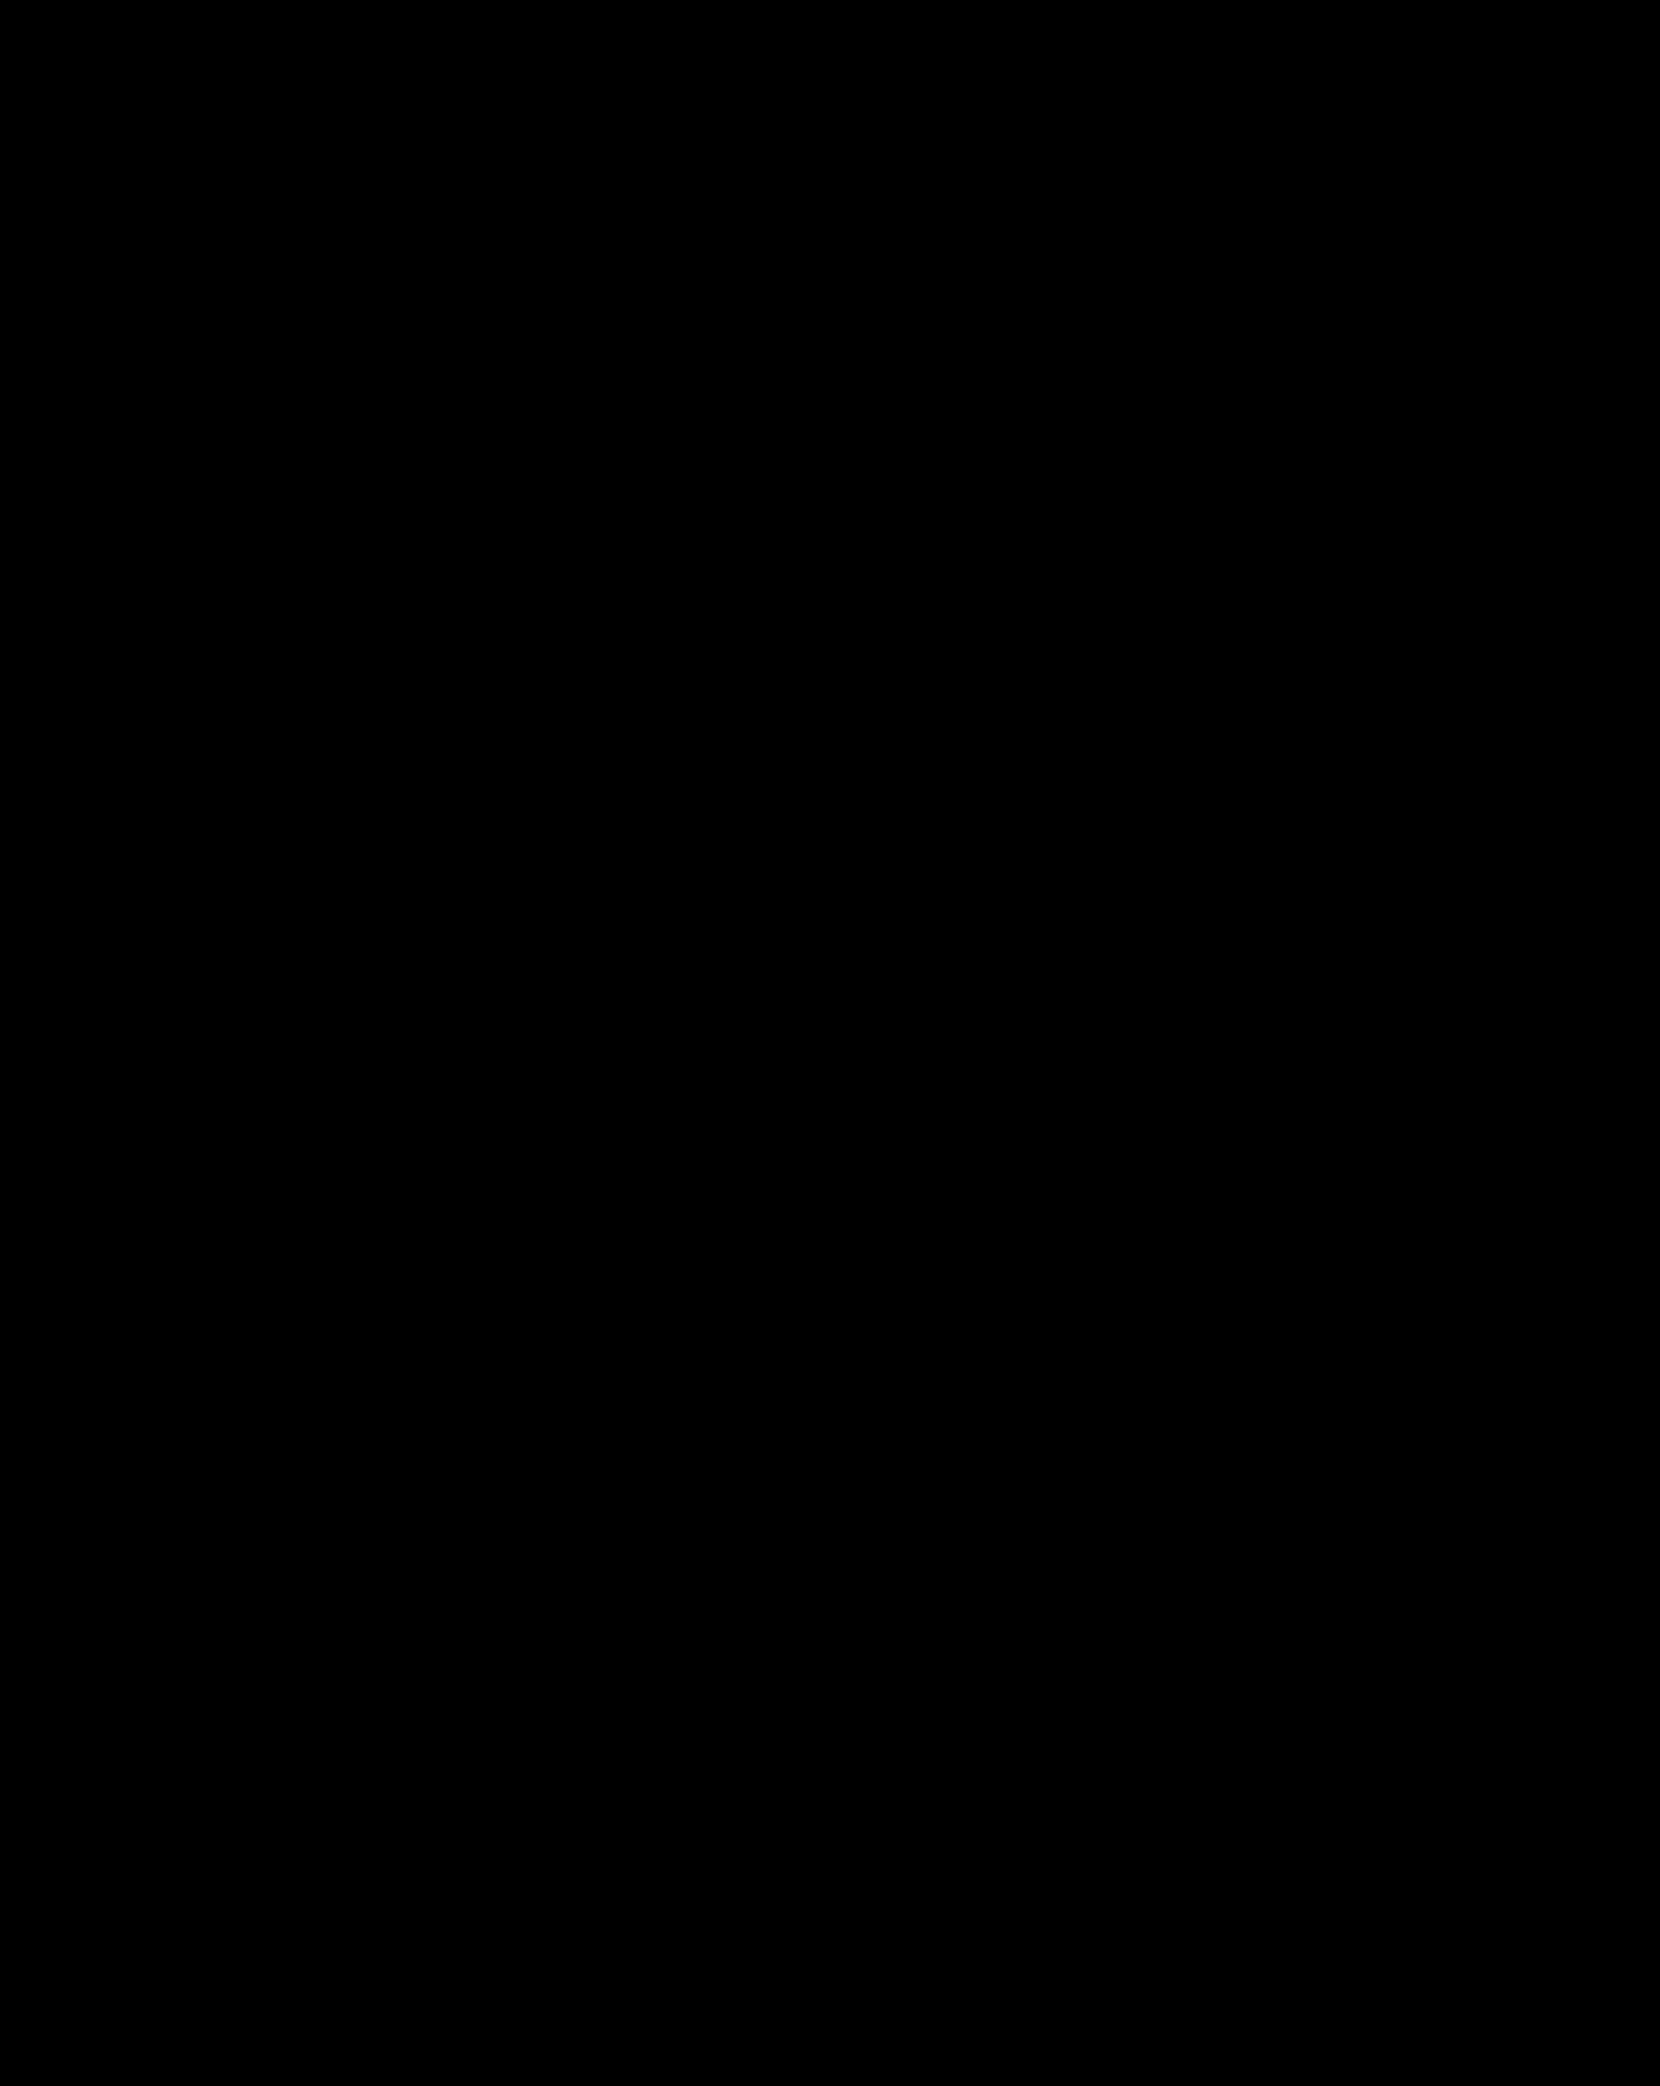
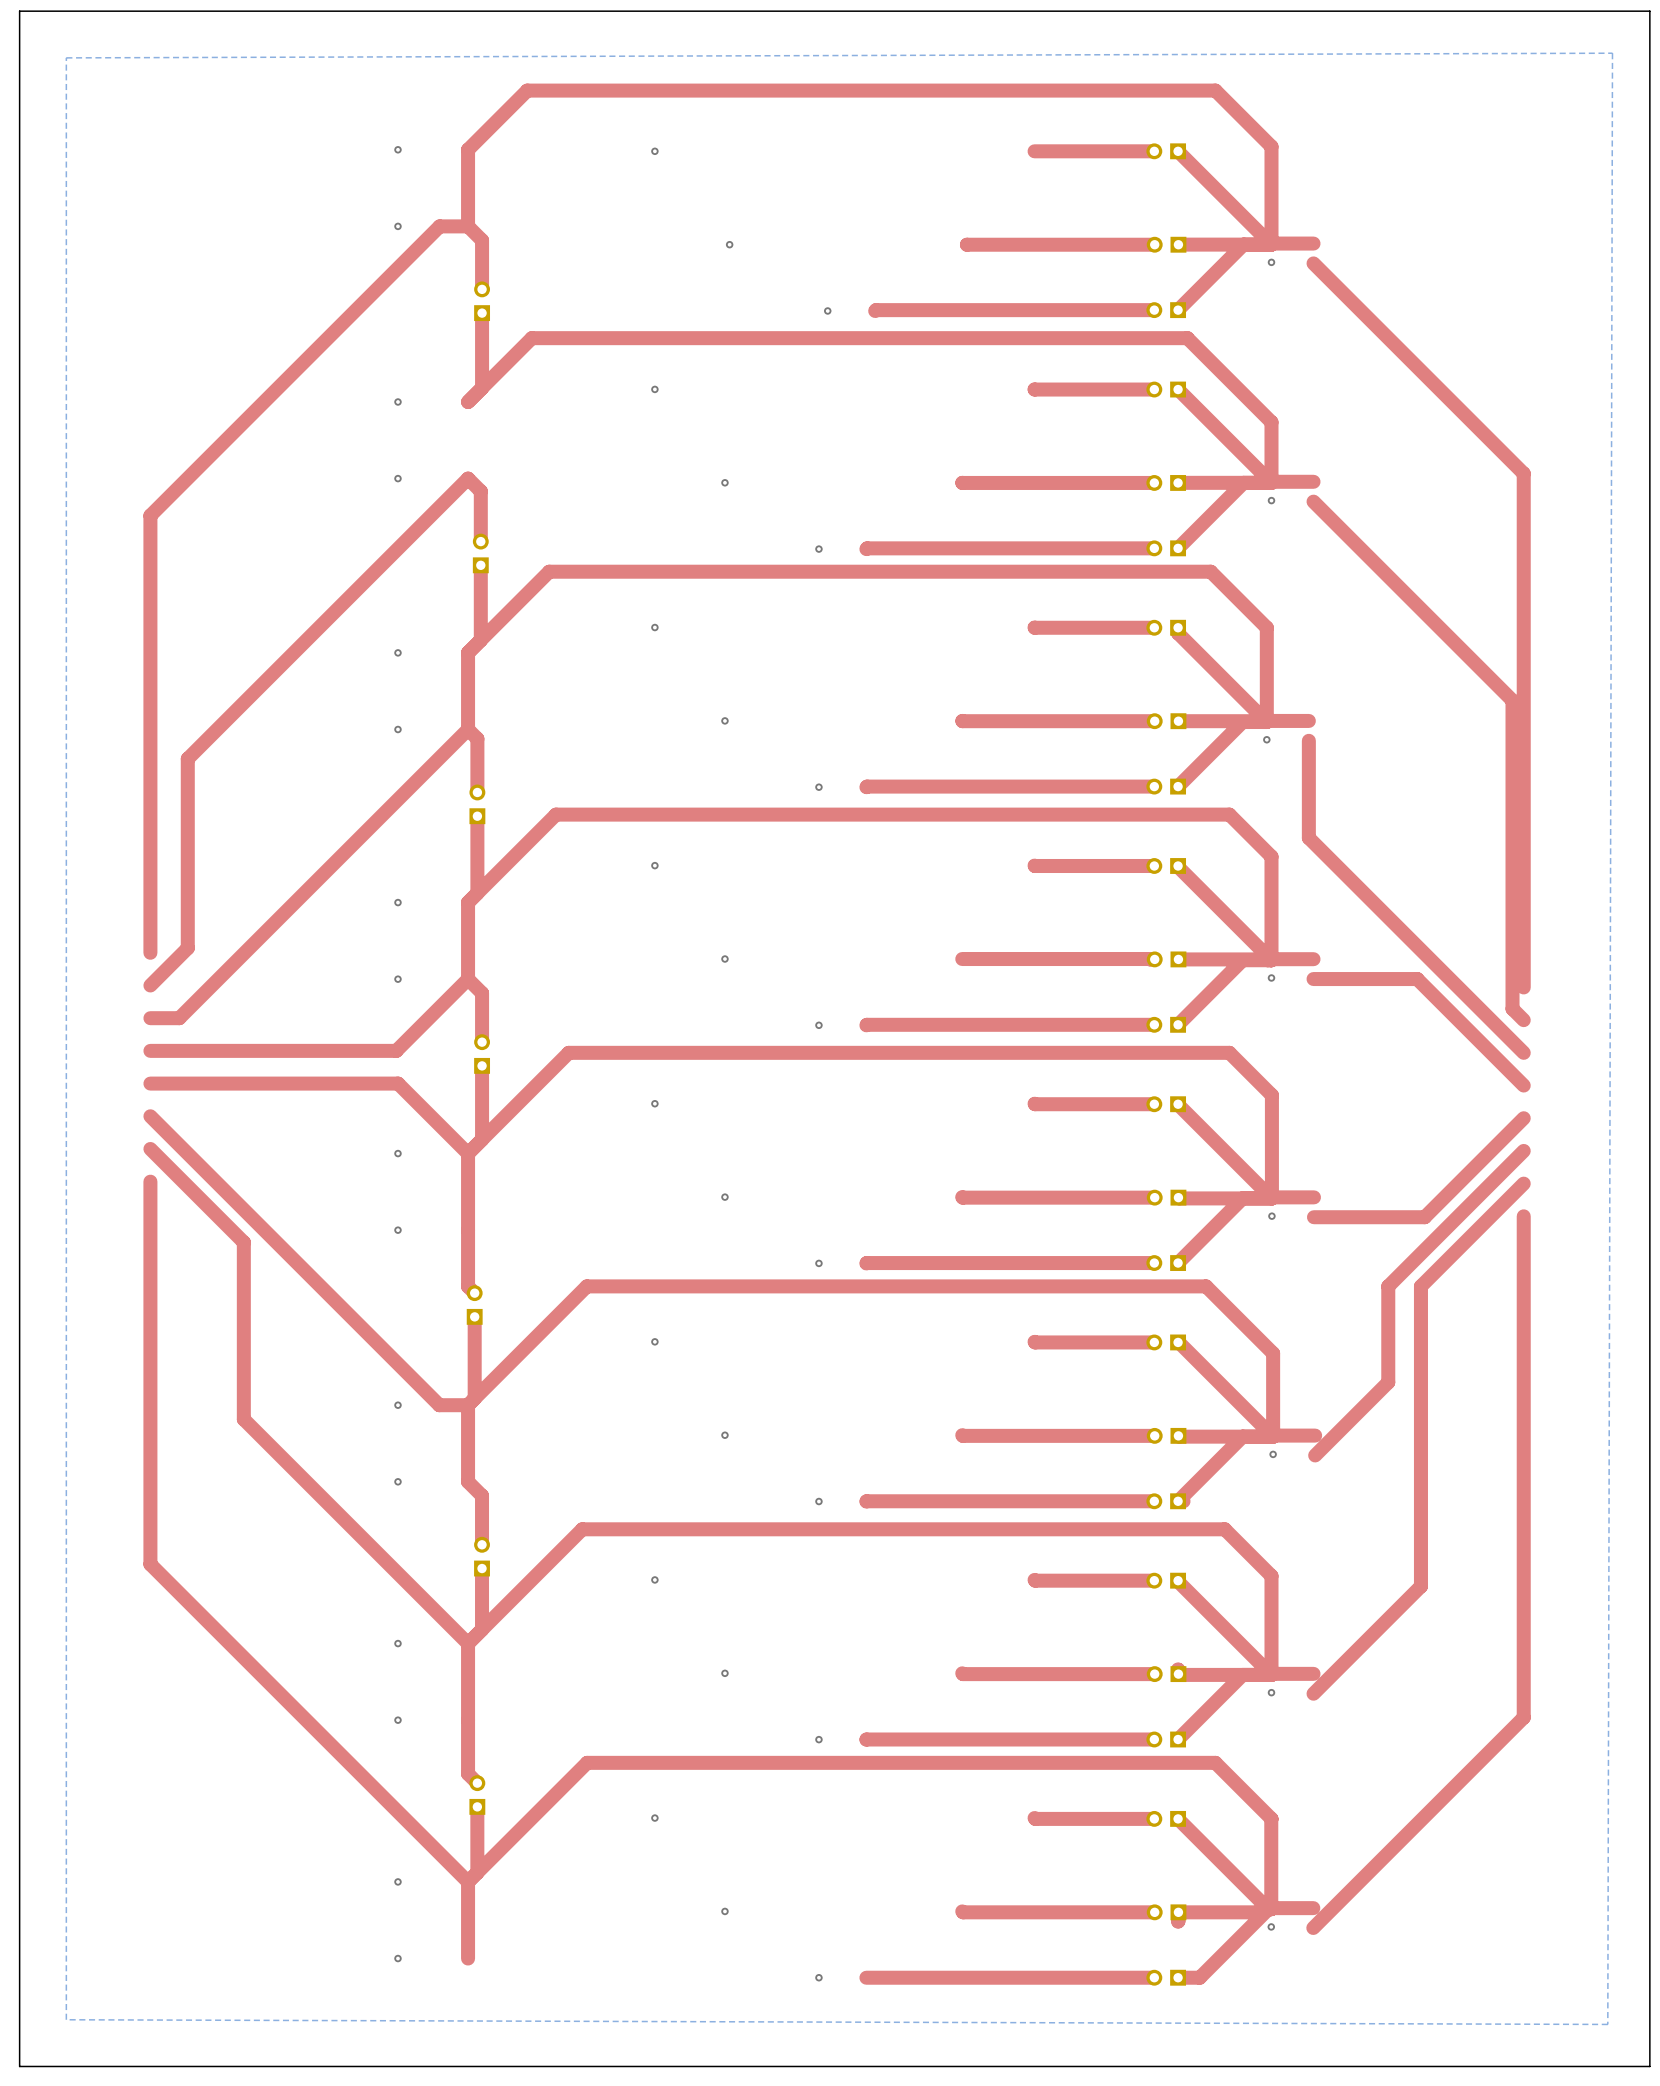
board edge: none -> (1649, 11) (19, 11) (19, 2066) (1649, 2066) (1649, 11)
bottom zone outline: none -> (1612, 53) (1607, 2024) (66, 2019) (66, 57) (1612, 53)
via: none -> (397, 149)
via: none -> (654, 151)
top track: none -> (1154, 151) (1034, 151)
part: none -> (1166, 151)
top track: none -> (1178, 151) (1271, 244)
via: none -> (397, 226)
top track: none -> (468, 226) (468, 149) (527, 90) (1215, 90) (1271, 146) (1271, 244)
top track: none -> (468, 226) (439, 226) (150, 515) (150, 952)
top track: none -> (468, 226) (482, 240) (482, 289)
top track: none -> (1313, 243) (1271, 244)
via: none -> (729, 244)
top track: none -> (1154, 244) (966, 244)
part: none -> (1166, 244)
top track: none -> (1243, 244) (1178, 310)
top track: none -> (1271, 244) (1178, 244)
via: none -> (1271, 262)
top track: none -> (1313, 263) (1523, 473) (1523, 987)
part: none -> (482, 301)
via: none -> (827, 310)
top track: none -> (1154, 310) (875, 310)
part: none -> (1166, 310)
top track: none -> (482, 313) (482, 387)
via: none -> (654, 389)
top track: none -> (1154, 389) (1034, 389)
part: none -> (1166, 389)
top track: none -> (1178, 389) (1271, 482)
via: none -> (397, 401)
top track: none -> (468, 401) (531, 338) (1187, 338) (1271, 422) (1271, 482)
via: none -> (397, 478)
top track: none -> (1313, 481) (1271, 482)
via: none -> (724, 482)
top track: none -> (962, 482) (1154, 482)
part: none -> (1166, 482)
top track: none -> (1243, 482) (1178, 548)
top track: none -> (1271, 482) (1178, 482)
via: none -> (1271, 500)
top track: none -> (1313, 501) (1512, 700) (1512, 1008) (1523, 1020)
top track: none -> (480, 541) (480, 491) (468, 478) (187, 758) (187, 948) (150, 985)
top track: none -> (1154, 548) (866, 549)
part: none -> (1166, 548)
via: none -> (818, 549)
part: none -> (480, 553)
top track: none -> (480, 565) (480, 640)
via: none -> (654, 627)
top track: none -> (1034, 627) (1154, 627)
part: none -> (1166, 627)
top track: none -> (1178, 628) (1178, 633) (1266, 722)
via: none -> (397, 652)
via: none -> (724, 720)
top track: none -> (962, 720) (1154, 721)
top track: none -> (1308, 720) (1266, 722)
part: none -> (1166, 721)
top track: none -> (1178, 721) (1262, 722)
top track: none -> (1266, 722) (1266, 627) (1210, 571) (549, 571) (468, 652) (468, 729)
top track: none -> (1266, 722) (1242, 722) (1178, 786)
via: none -> (397, 729)
top track: none -> (468, 729) (179, 1018) (150, 1018)
top track: none -> (468, 729) (477, 738) (477, 792)
via: none -> (1266, 739)
top track: none -> (1308, 740) (1308, 837) (1523, 1052)
top track: none -> (1154, 786) (866, 787)
part: none -> (1166, 786)
via: none -> (818, 787)
part: none -> (477, 804)
top track: none -> (477, 816) (477, 893)
via: none -> (654, 865)
top track: none -> (1034, 865) (1154, 865)
part: none -> (1166, 865)
top track: none -> (1178, 865) (1271, 960)
via: none -> (397, 902)
via: none -> (724, 959)
top track: none -> (962, 959) (1154, 959)
part: none -> (1166, 959)
top track: none -> (1178, 959) (1267, 960)
top track: none -> (1313, 959) (1271, 960)
top track: none -> (1271, 960) (1271, 856) (1229, 814) (556, 814) (468, 902) (468, 979)
top track: none -> (1271, 960) (1242, 960) (1178, 1024)
via: none -> (1271, 977)
via: none -> (397, 979)
top track: none -> (468, 979) (482, 993) (482, 1042)
top track: none -> (468, 979) (396, 1050) (150, 1050)
top track: none -> (1313, 979) (1417, 979) (1523, 1085)
top track: none -> (1154, 1024) (866, 1025)
part: none -> (1166, 1024)
via: none -> (818, 1025)
part: none -> (482, 1054)
top track: none -> (482, 1065) (482, 1139)
top track: none -> (150, 1083) (398, 1083) (468, 1153)
via: none -> (654, 1103)
top track: none -> (1034, 1103) (1154, 1104)
part: none -> (1166, 1104)
top track: none -> (1178, 1104) (1271, 1198)
top track: none -> (150, 1116) (439, 1405) (468, 1405)
top track: none -> (1523, 1118) (1424, 1217) (1313, 1217)
top track: none -> (150, 1148) (243, 1242) (243, 1419) (468, 1643)
top track: none -> (1523, 1150) (1388, 1286) (1388, 1382) (1315, 1455)
via: none -> (397, 1153)
top track: none -> (468, 1153) (468, 1286) (474, 1293)
top track: none -> (468, 1153) (568, 1052) (1229, 1052) (1271, 1095) (1271, 1198)
top track: none -> (150, 1181) (150, 1564) (468, 1881)
top track: none -> (1523, 1183) (1420, 1286) (1420, 1586) (1313, 1693)
via: none -> (724, 1197)
top track: none -> (962, 1197) (1154, 1197)
part: none -> (1166, 1197)
top track: none -> (1178, 1197) (1271, 1198)
top track: none -> (1313, 1197) (1271, 1198)
top track: none -> (1242, 1198) (1178, 1263)
via: none -> (1271, 1216)
top track: none -> (1523, 1216) (1523, 1717) (1313, 1927)
via: none -> (397, 1230)
via: none -> (818, 1263)
top track: none -> (1154, 1263) (866, 1263)
part: none -> (1166, 1263)
part: none -> (474, 1305)
top track: none -> (474, 1316) (474, 1398)
via: none -> (654, 1341)
top track: none -> (1034, 1341) (1154, 1342)
part: none -> (1166, 1342)
top track: none -> (1178, 1342) (1273, 1436)
via: none -> (397, 1405)
top track: none -> (468, 1405) (468, 1481) (482, 1495) (482, 1544)
top track: none -> (468, 1405) (586, 1286) (1206, 1286) (1273, 1353) (1273, 1436)
via: none -> (724, 1435)
top track: none -> (962, 1435) (1154, 1435)
part: none -> (1166, 1435)
top track: none -> (1178, 1435) (1273, 1436)
top track: none -> (1315, 1435) (1273, 1436)
top track: none -> (1242, 1436) (1178, 1501) (1183, 1501)
via: none -> (1273, 1454)
via: none -> (397, 1481)
via: none -> (818, 1501)
top track: none -> (1154, 1501) (866, 1501)
part: none -> (1166, 1501)
part: none -> (482, 1556)
top track: none -> (482, 1568) (482, 1629)
via: none -> (654, 1579)
top track: none -> (1034, 1579) (1154, 1580)
part: none -> (1166, 1580)
top track: none -> (1178, 1580) (1271, 1674)
via: none -> (397, 1643)
top track: none -> (468, 1643) (468, 1773) (477, 1783)
top track: none -> (468, 1643) (582, 1529) (1224, 1529) (1271, 1576) (1271, 1674)
top track: none -> (1178, 1669) (1179, 1674) (1271, 1674)
via: none -> (724, 1673)
top track: none -> (962, 1673) (1154, 1674)
top track: none -> (1313, 1673) (1271, 1674)
part: none -> (1166, 1674)
top track: none -> (1242, 1674) (1178, 1739)
via: none -> (1271, 1692)
via: none -> (397, 1720)
via: none -> (818, 1739)
top track: none -> (1154, 1739) (866, 1739)
part: none -> (1166, 1739)
part: none -> (477, 1795)
top track: none -> (477, 1806) (477, 1872)
via: none -> (654, 1818)
top track: none -> (1034, 1818) (1154, 1818)
part: none -> (1166, 1818)
top track: none -> (1178, 1818) (1268, 1909) (1199, 1977) (1178, 1977)
via: none -> (397, 1881)
top track: none -> (468, 1881) (468, 1958)
top track: none -> (468, 1881) (587, 1762) (1215, 1762) (1271, 1818) (1271, 1909)
top track: none -> (1313, 1908) (1271, 1909)
top track: none -> (1271, 1909) (1263, 1909) (1260, 1912) (1178, 1912) (1178, 1921)
via: none -> (724, 1911)
top track: none -> (962, 1911) (1154, 1912)
part: none -> (1166, 1912)
via: none -> (1271, 1926)
via: none -> (397, 1958)
via: none -> (818, 1977)
top track: none -> (1154, 1977) (866, 1977)
part: none -> (1166, 1977)

